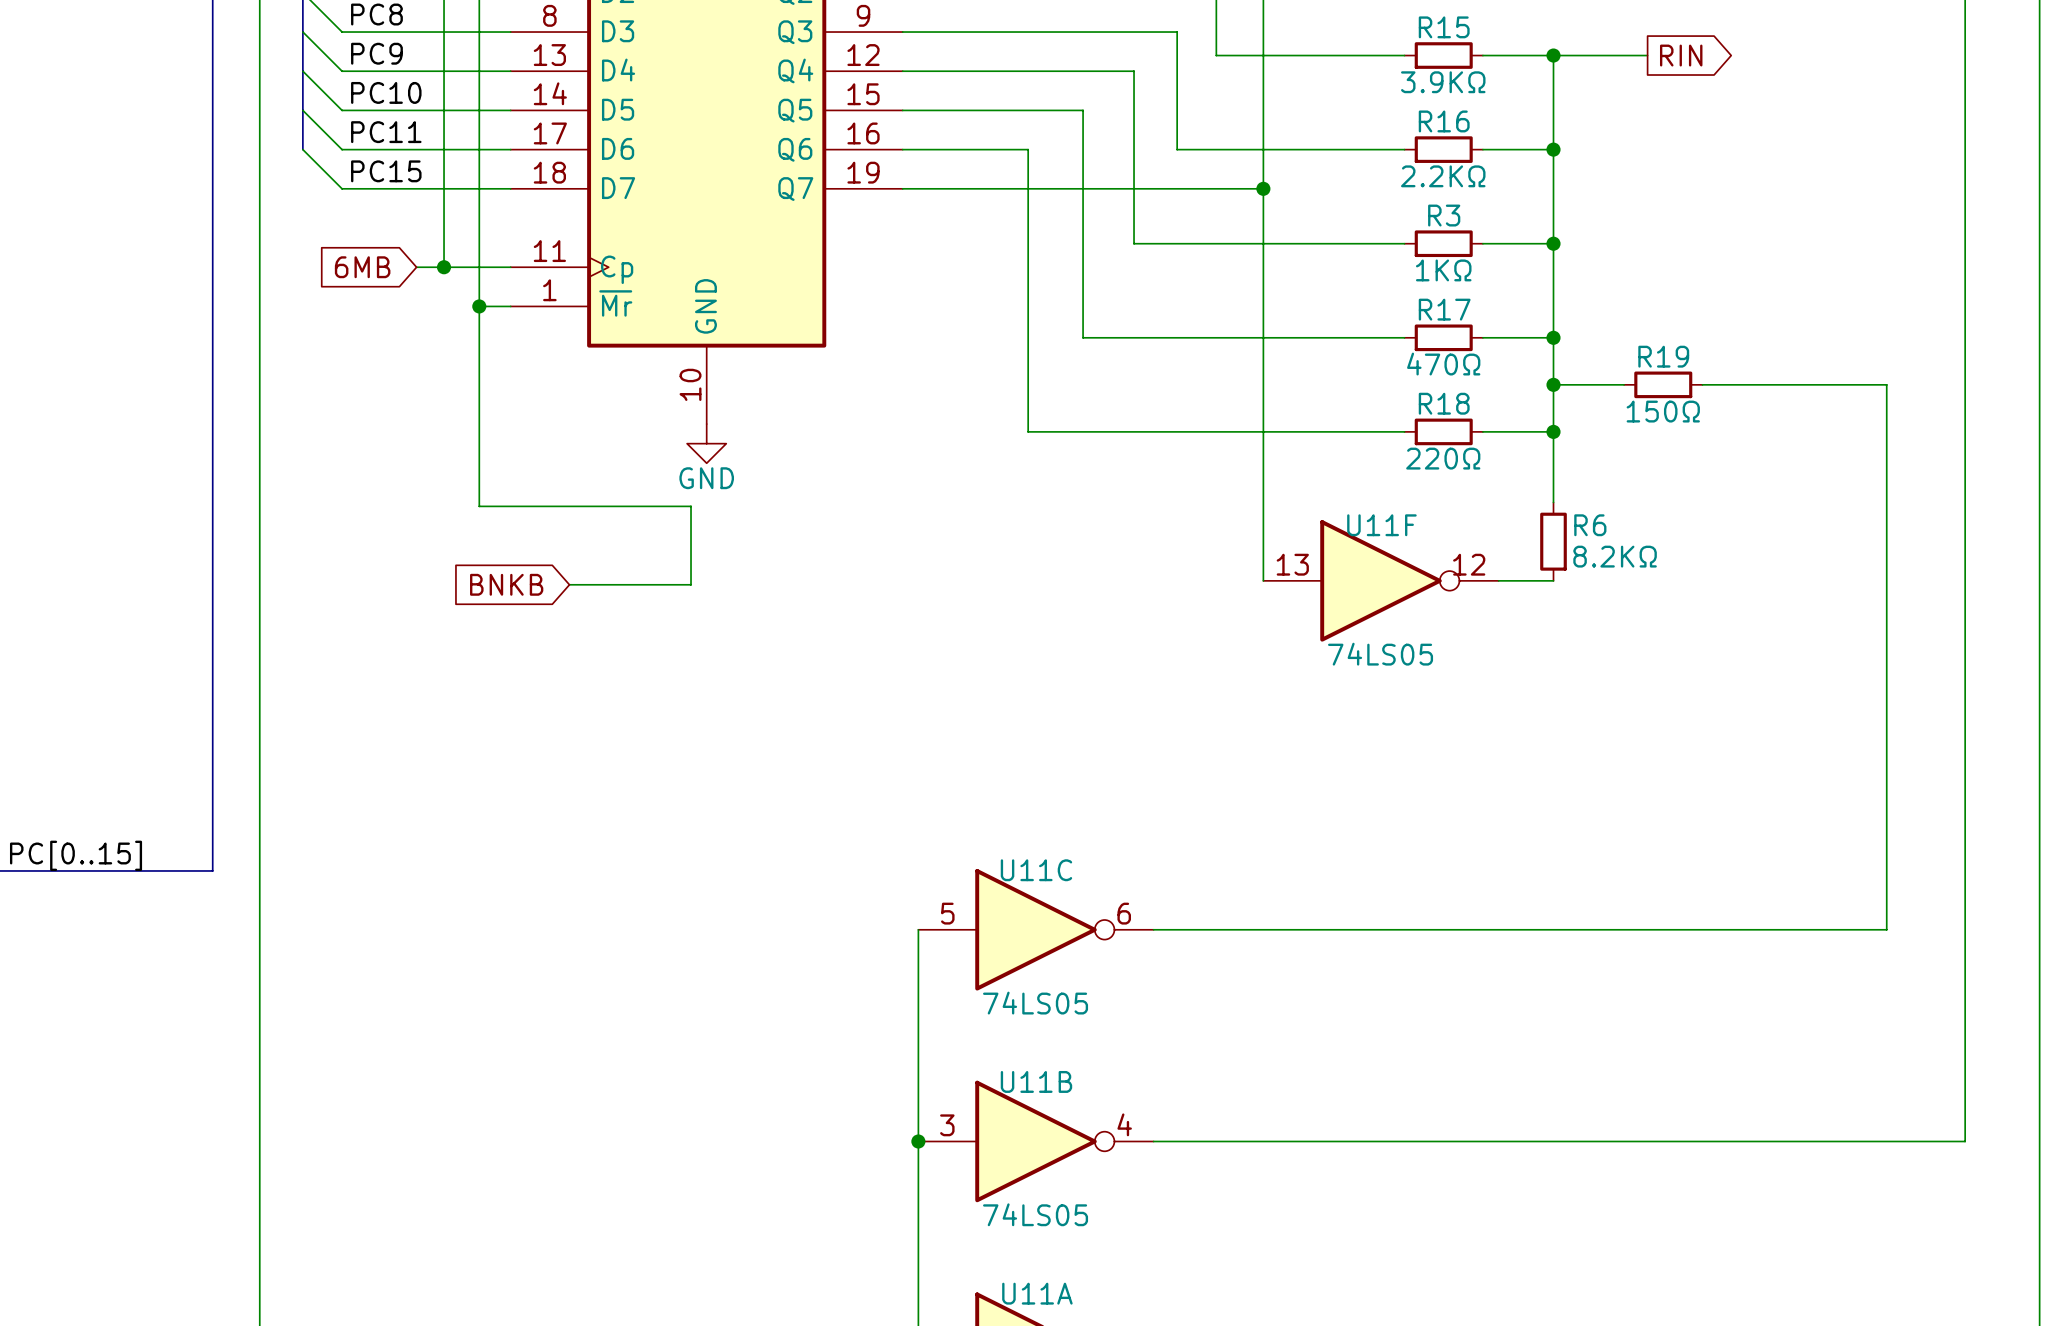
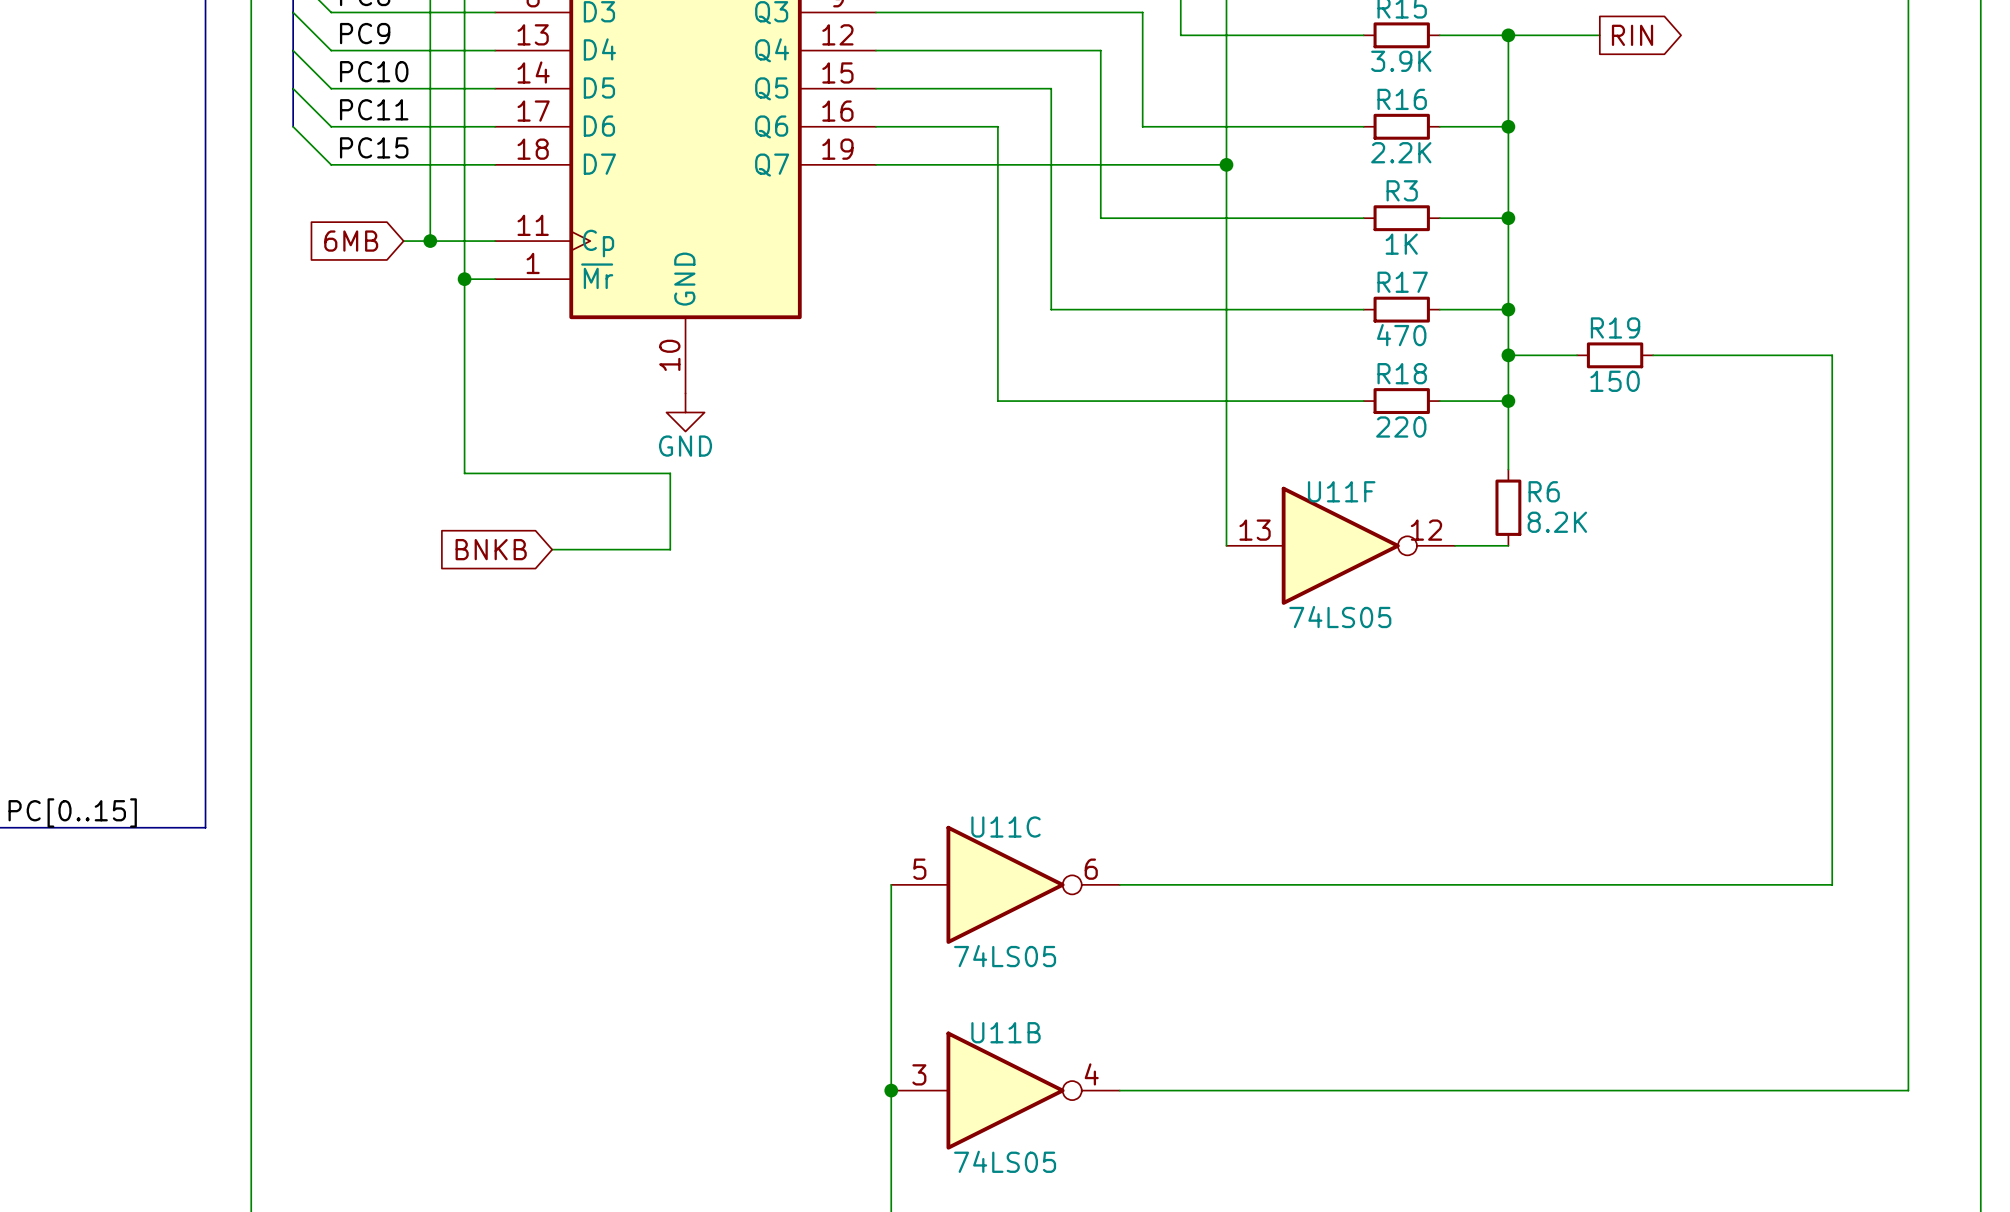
R15 value: 3.9KΩ (1443, 82) -> 3.9K (1401, 61)
R16 value: 2.2KΩ (1443, 176) -> 2.2K (1401, 152)
R3 value: 1KΩ (1443, 270) -> 1K (1401, 244)
R17 value: 470Ω (1443, 364) -> 470 (1401, 335)
R19 value: 150Ω (1663, 411) -> 150 (1615, 381)
R18 value: 220Ω (1443, 458) -> 220 (1401, 427)
R6 value: 8.2KΩ (1615, 556) -> 8.2K (1557, 522)

